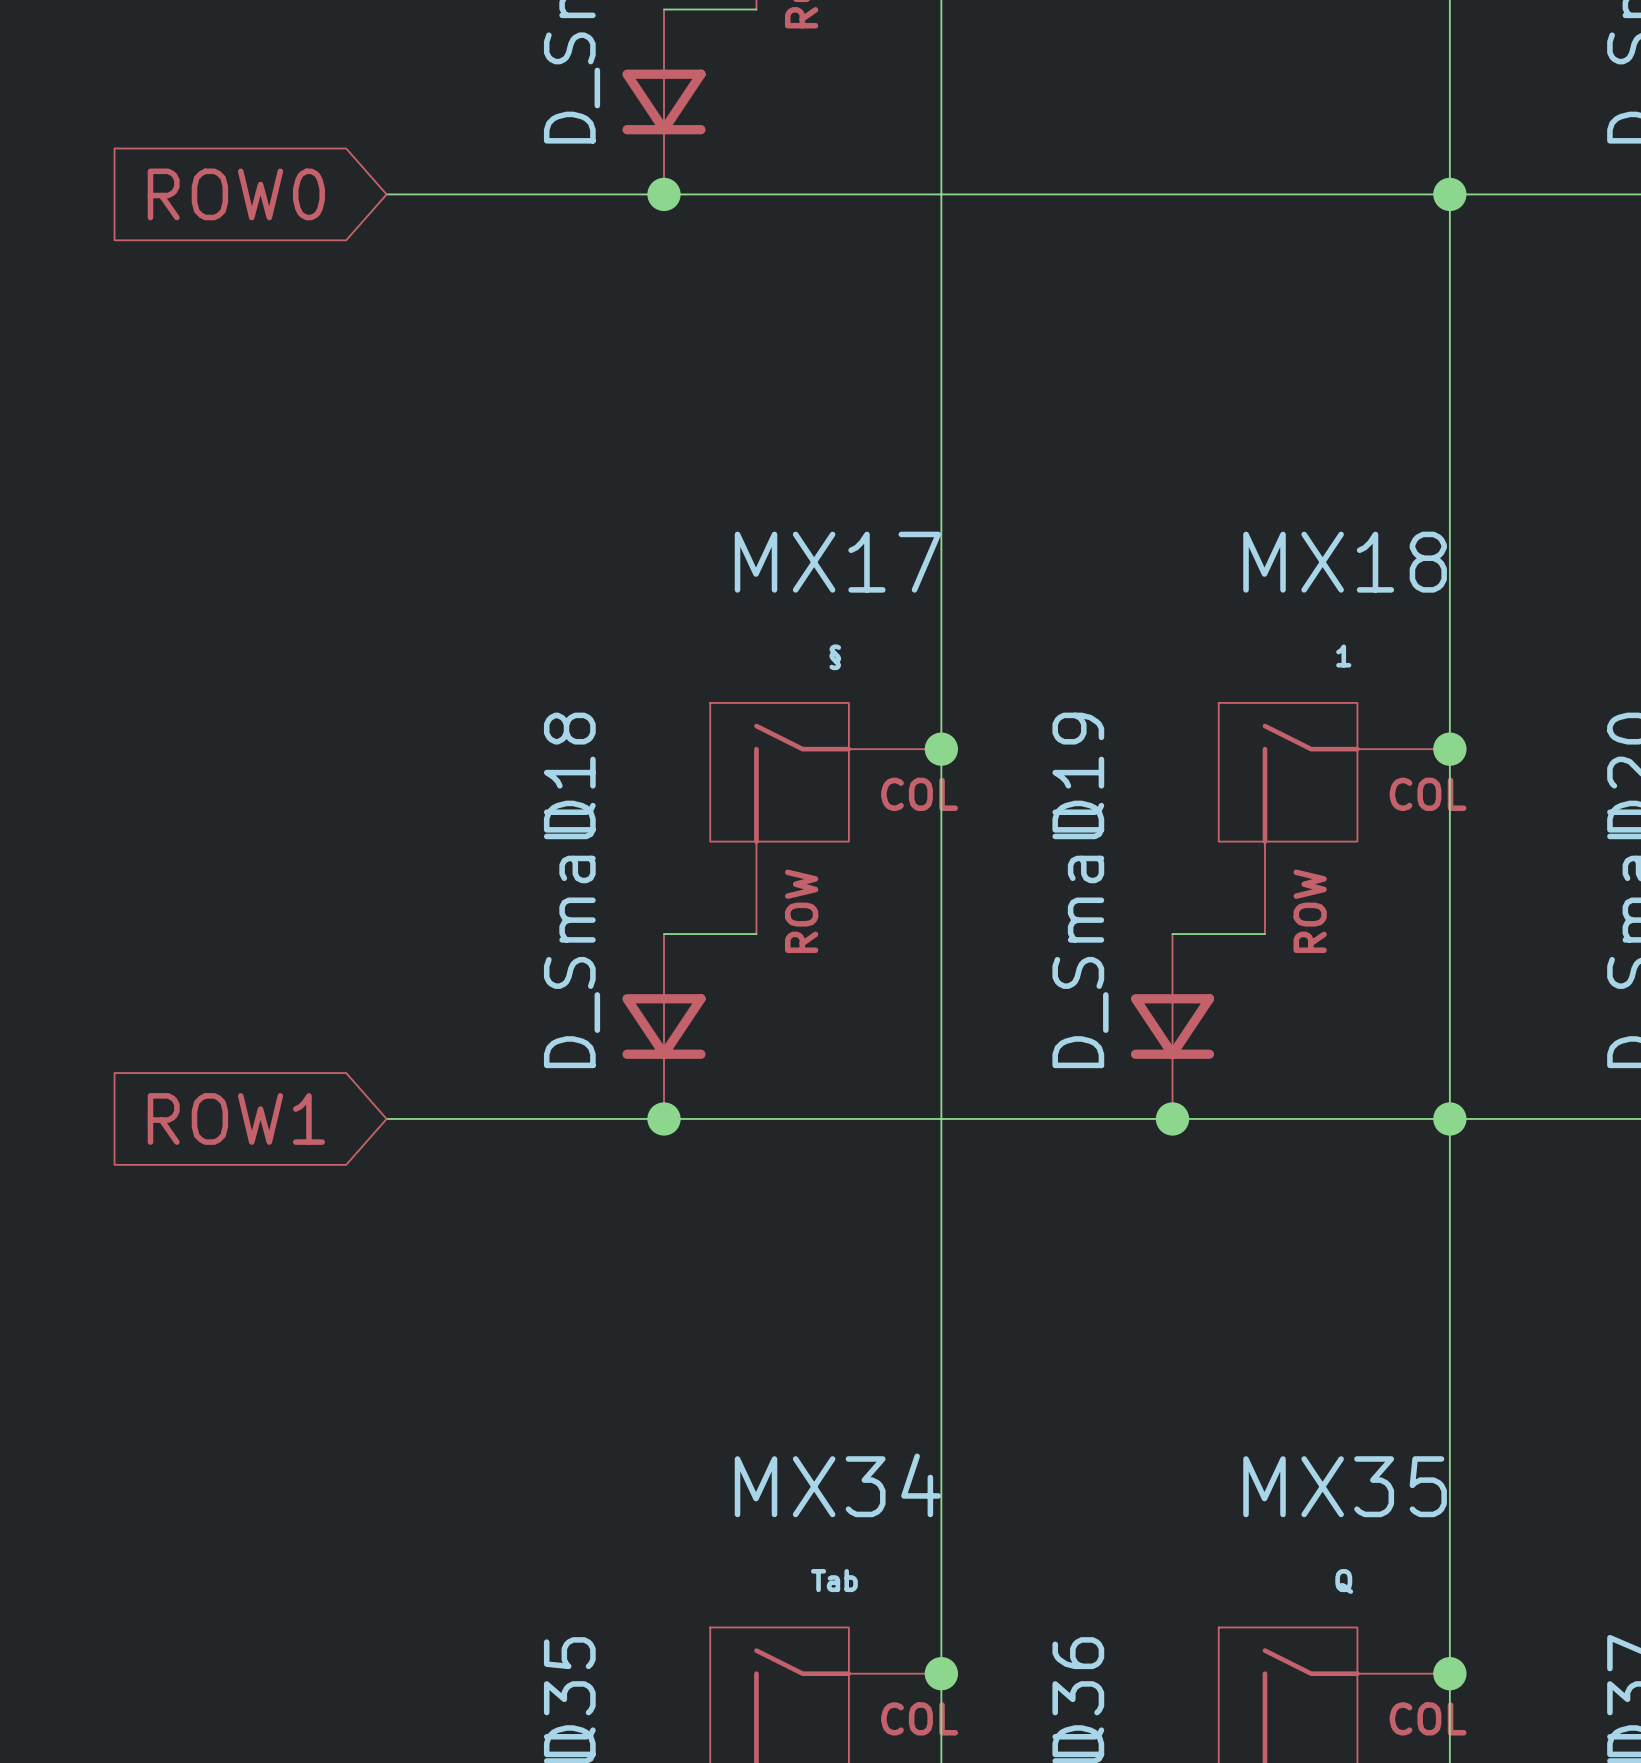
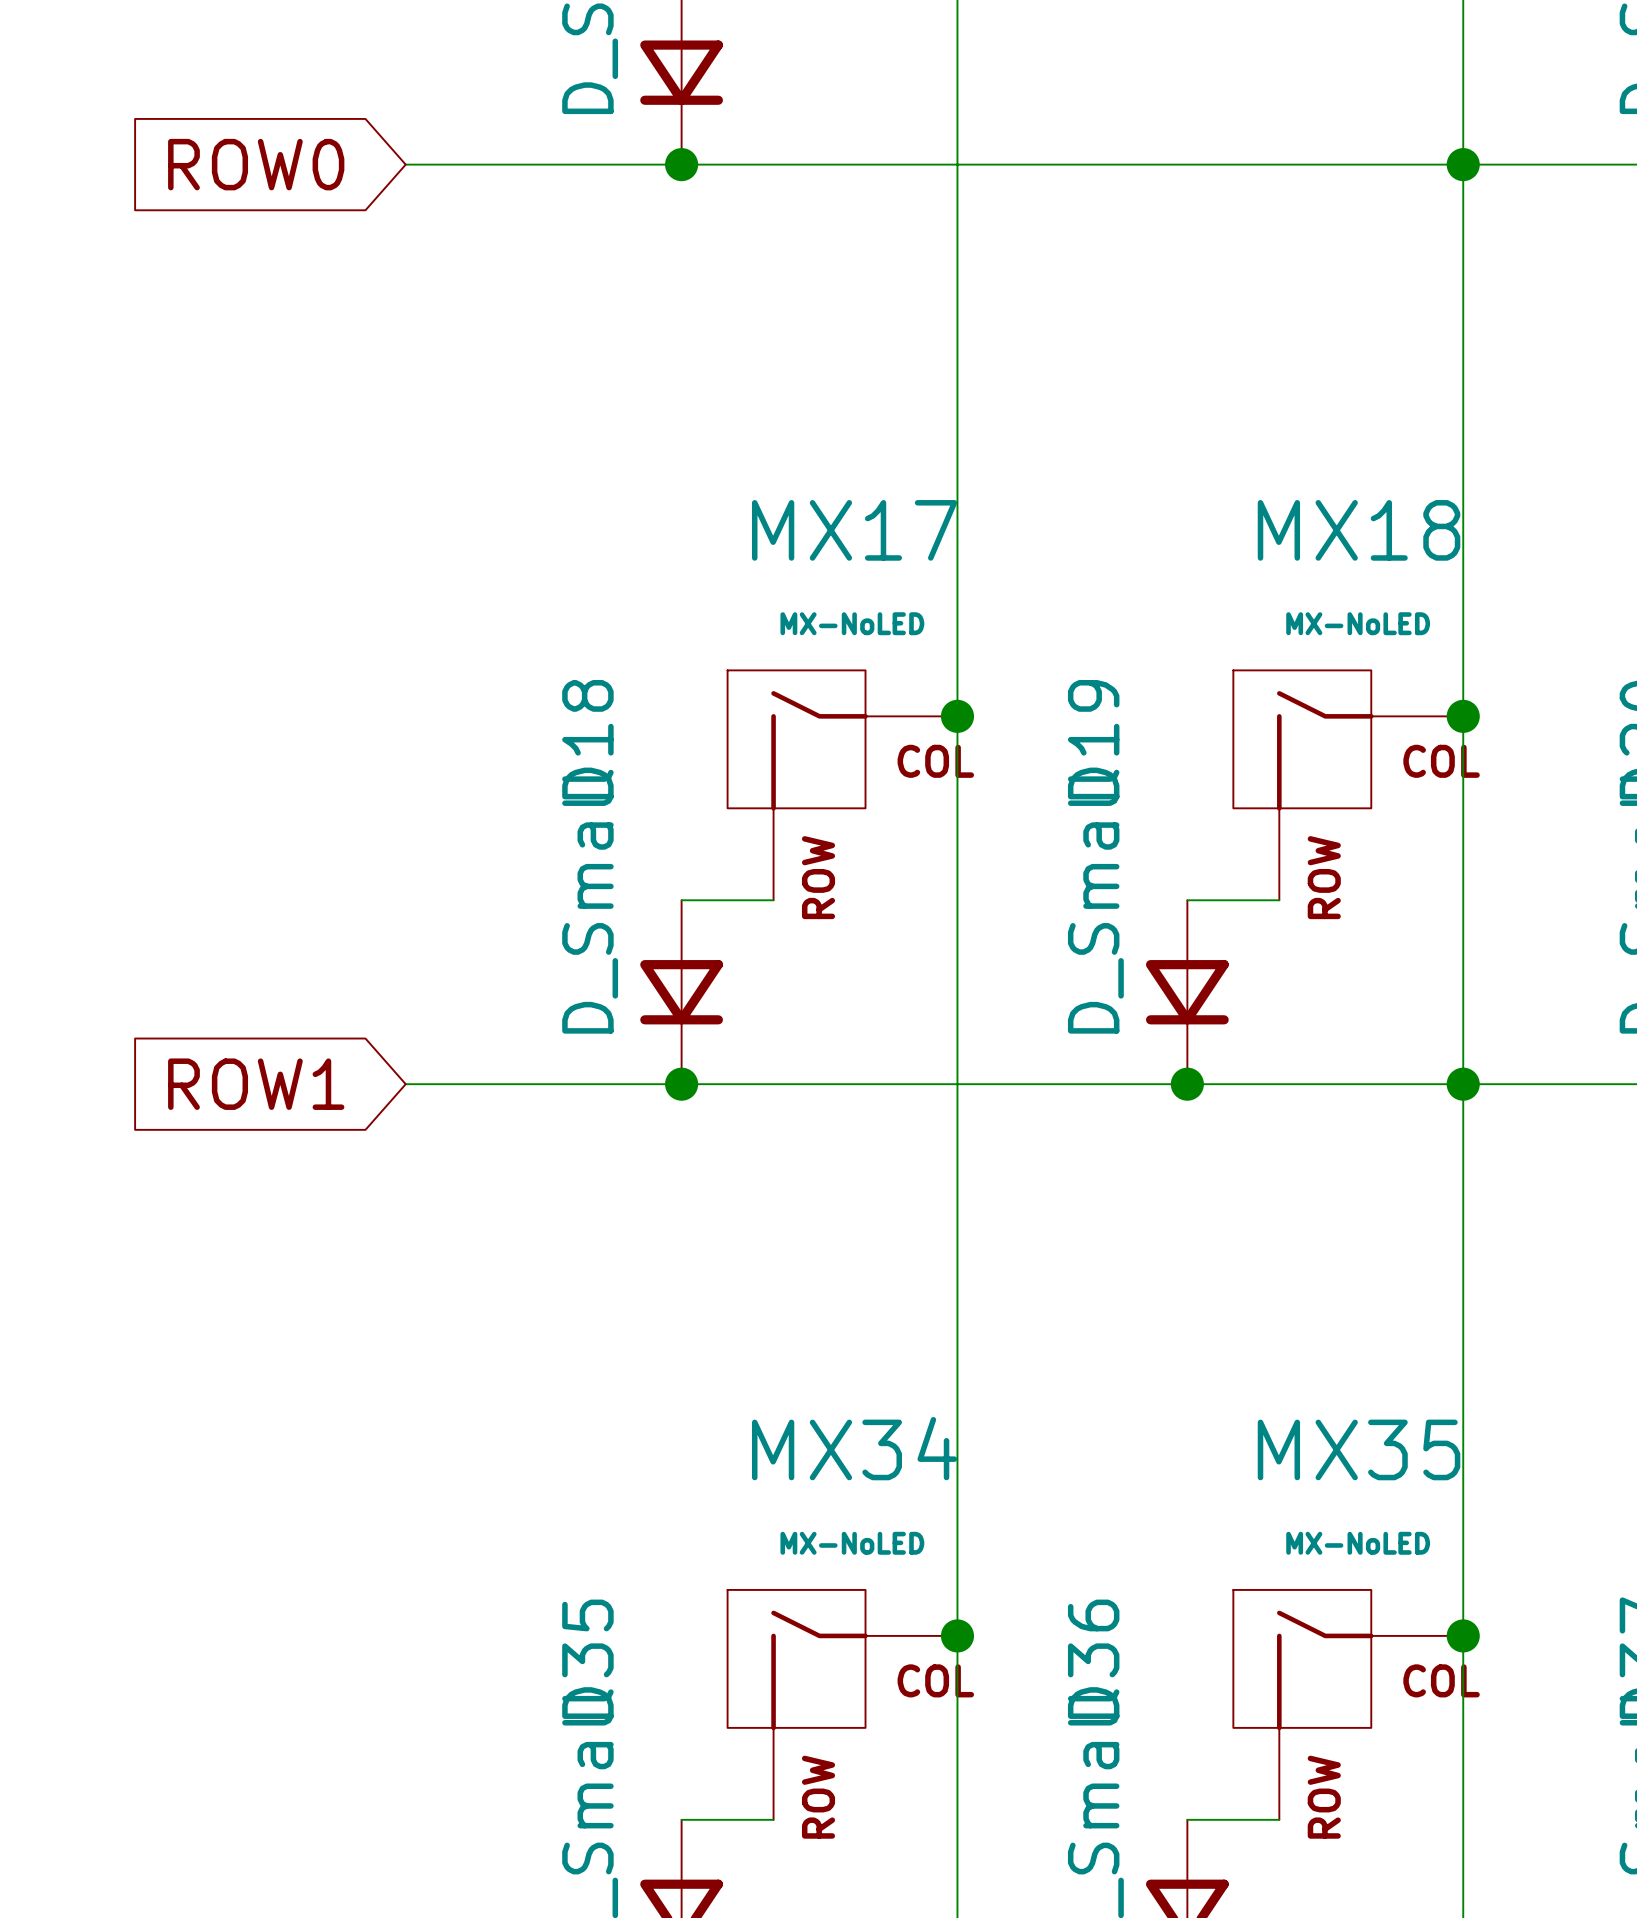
MX18 value: 1 (1343, 656) -> MX-NoLED (1358, 623)
MX17 value: § (835, 657) -> MX-NoLED (852, 623)
MX34 value: Tab (834, 1580) -> MX-NoLED (852, 1543)
MX35 value: Q (1344, 1581) -> MX-NoLED (1358, 1543)

